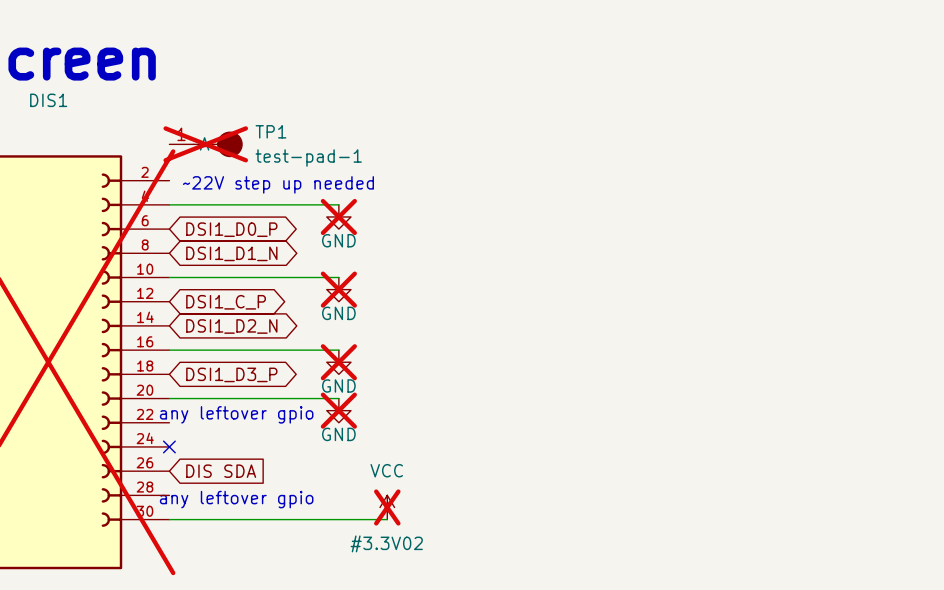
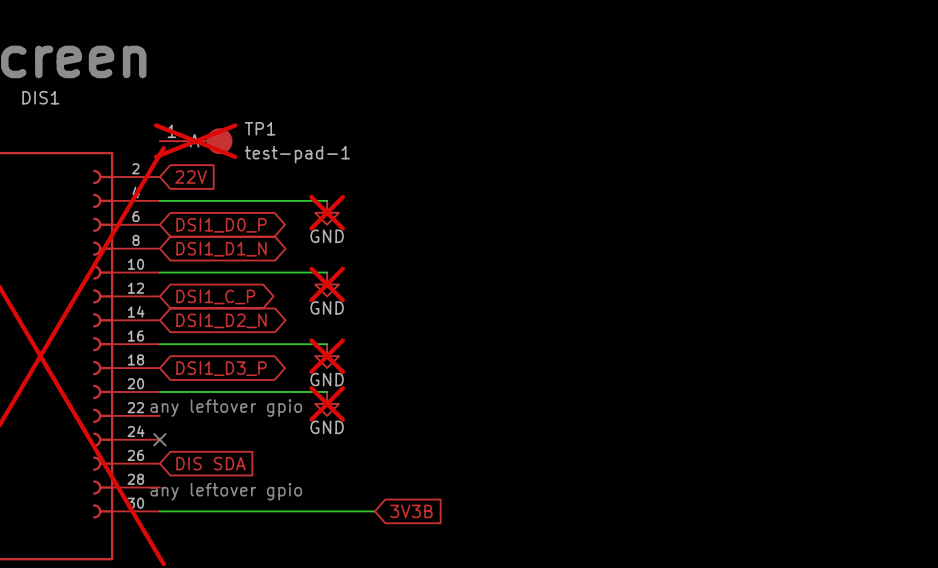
global label: none -> 22V (191, 176)
text: ~22V step up needed (278, 184) -> none
#3.3V02: VCC (387, 507) -> none
global label: none -> 3V3B (411, 511)

